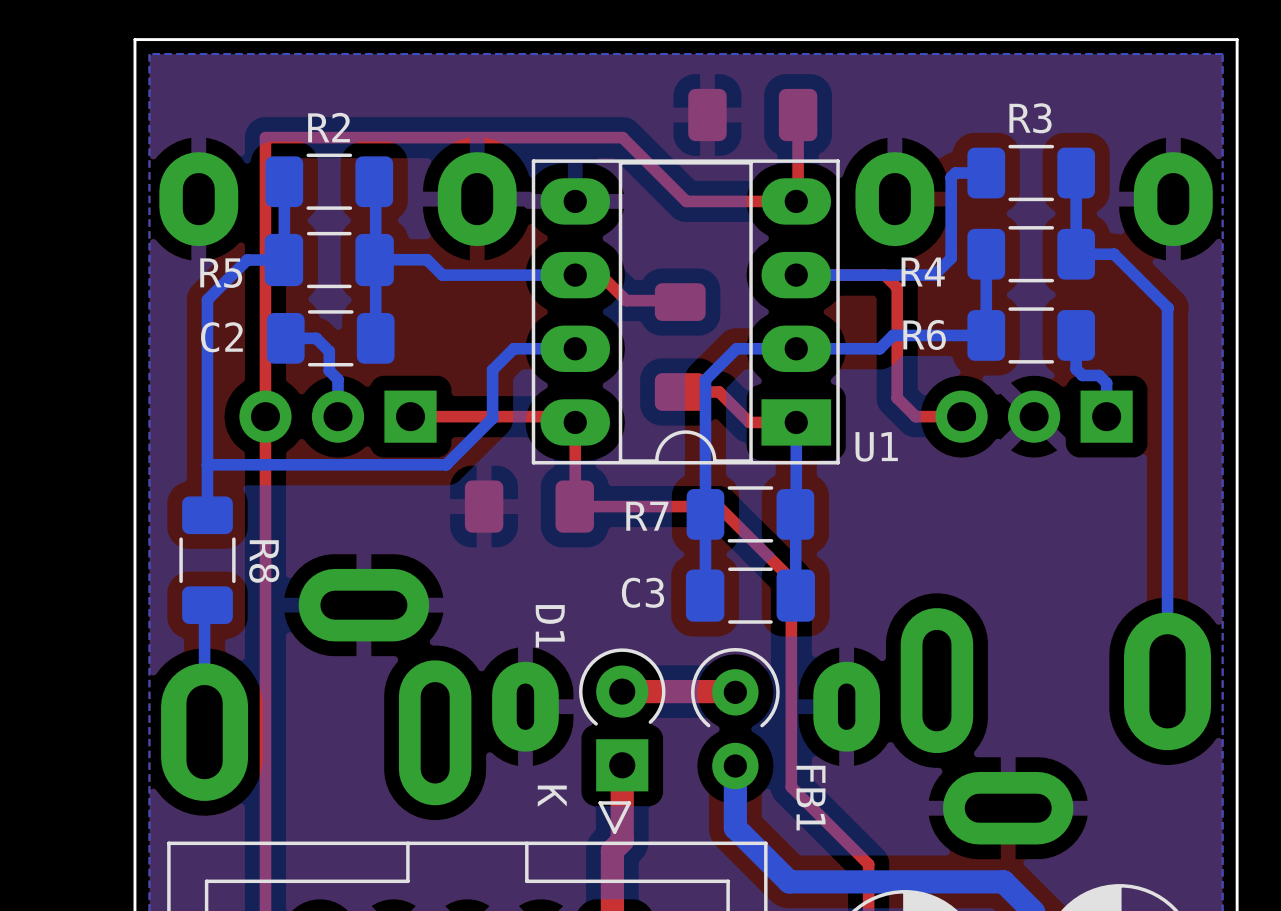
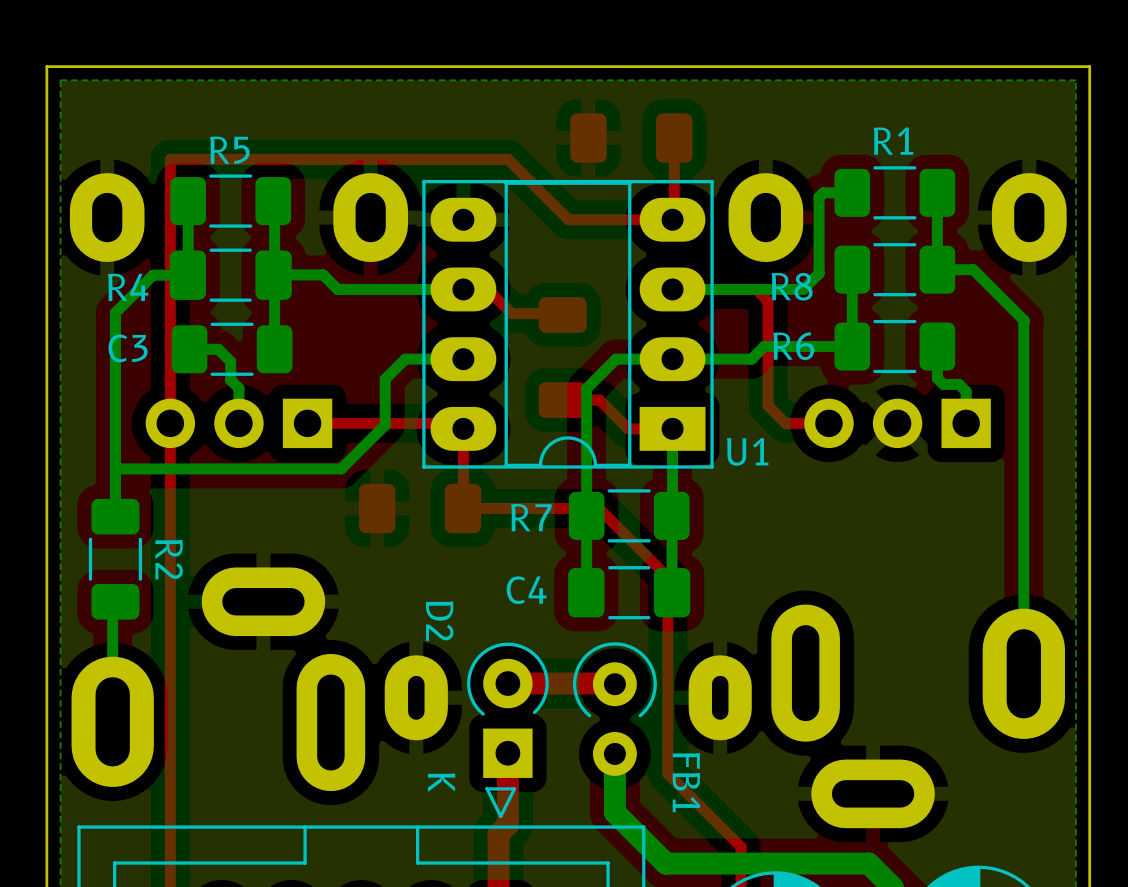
R3 name: R3 (1030, 118) -> R1 (893, 141)
R2 name: R2 (329, 127) -> R5 (229, 150)
R4 name: R4 (923, 271) -> R8 (792, 286)
R5 name: R5 (221, 273) -> R4 (128, 287)
C2 name: C2 (221, 337) -> C3 (128, 348)
R8 name: R8 (264, 561) -> R2 (169, 559)
C3 name: C3 (642, 592) -> C4 (526, 590)
D1 name: D1 (550, 626) -> D2 (439, 621)

